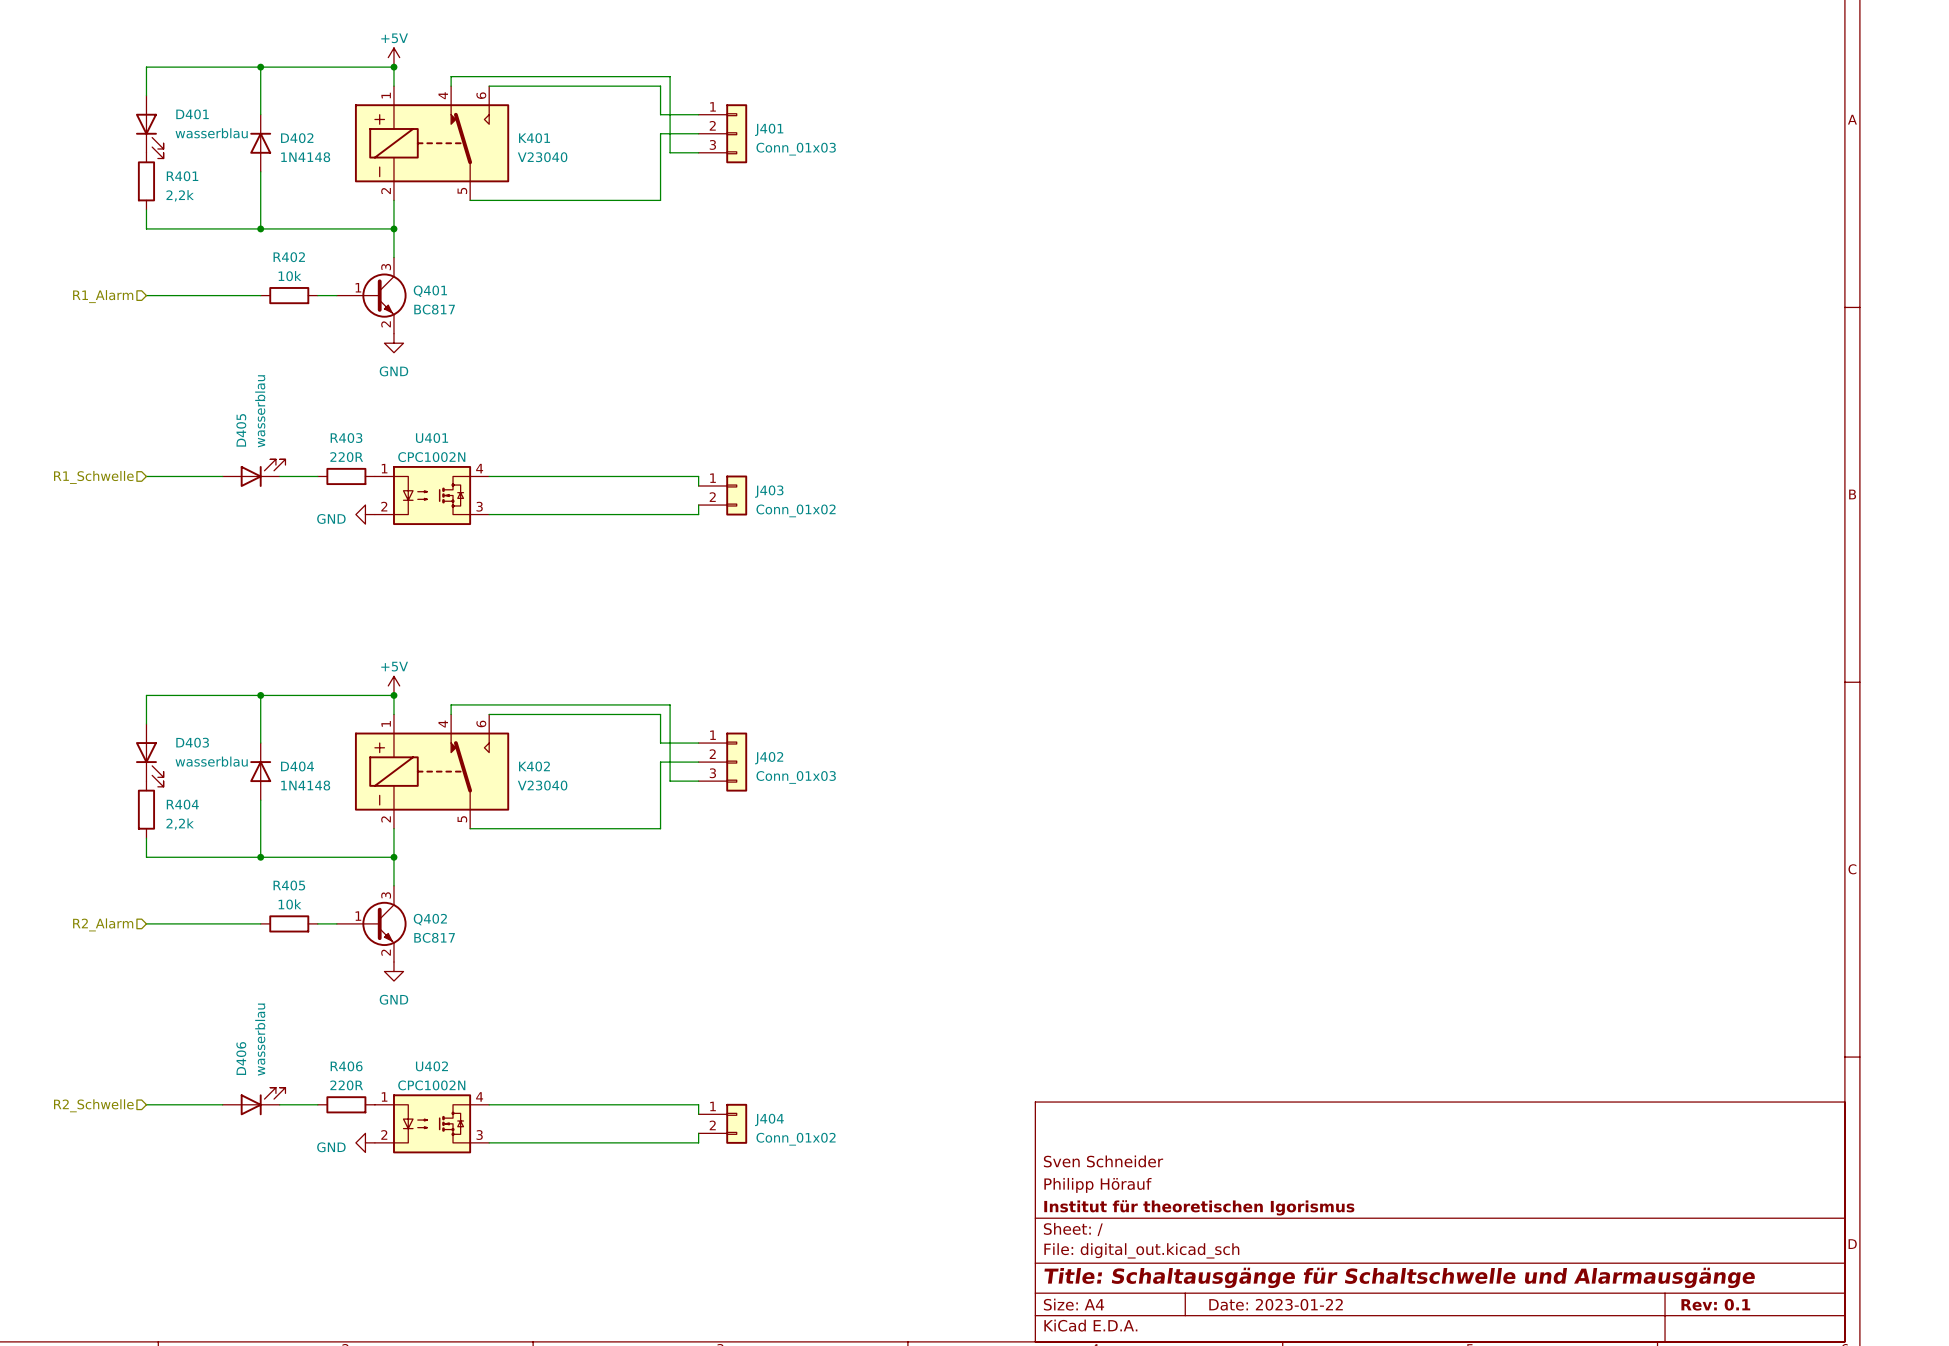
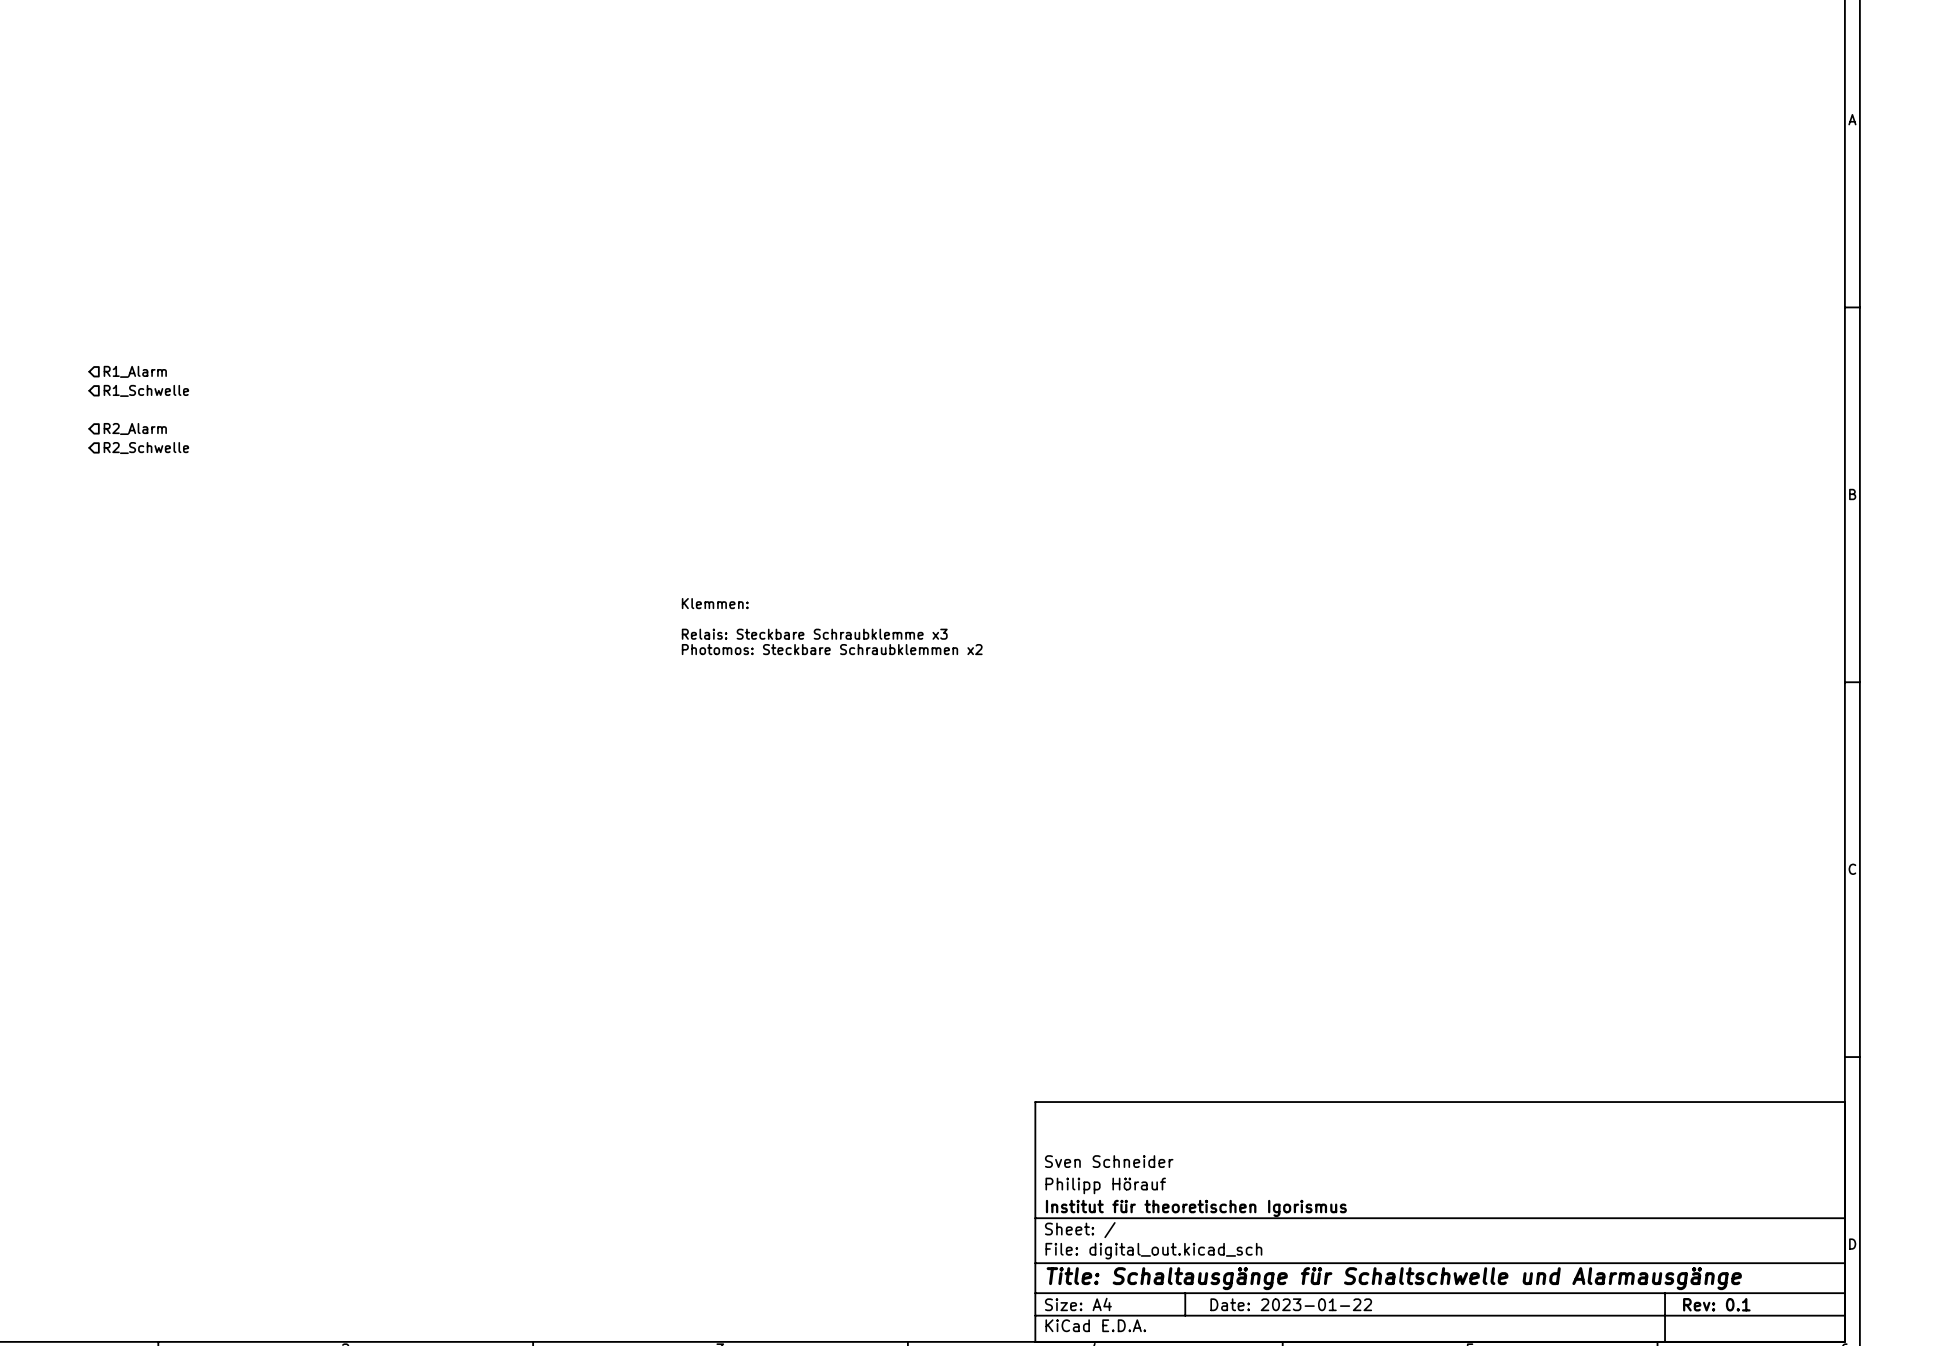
power symbol: +5V (393, 57) -> none
wire: (260, 67) (260, 114) -> none
junction: (260, 67) -> none
junction: (393, 67) -> none
wire: (393, 86) (393, 67) (146, 67) (146, 95) -> none
wire: (451, 86) (451, 76) (670, 76) (670, 152) (698, 152) -> none
wire: (489, 86) (660, 86) (660, 114) (698, 114) -> none
D401: wasserblau (149, 127) -> none
wire: (698, 133) (660, 133) (660, 200) (470, 200) -> none
J401: Conn_01x03 (722, 133) -> none
D402: 1N4148 (260, 143) -> none
K401: V23040 (432, 143) -> none
wire: (260, 171) (260, 228) -> none
R401: 2,2k (146, 181) -> none
wire: (393, 200) (393, 257) -> none
wire: (146, 209) (146, 228) (393, 228) -> none
junction: (260, 228) -> none
junction: (393, 228) -> none
wire: (146, 295) (260, 295) -> none
R402: 10k (289, 295) -> none
wire: (317, 295) (336, 295) -> none
Q401: BC817 (371, 295) -> none
hierarchical label rotation: 0° (103, 296) -> 180° (135, 371)
hierarchical label position: R1_Alarm (103, 296) -> R1_Alarm (135, 371)
power symbol: GND (393, 343) -> none
hierarchical label: none -> R2_Alarm (135, 428)
hierarchical label: none -> R2_Schwelle (146, 448)
D405: wasserblau (254, 473) -> none
wire: (146, 476) (222, 476) -> none
wire: (279, 476) (317, 476) -> none
R403: 220R (346, 476) -> none
wire: (489, 476) (698, 476) (698, 485) -> none
hierarchical label rotation: 0° (93, 477) -> 180° (146, 390)
hierarchical label position: R1_Schwelle (93, 477) -> R1_Schwelle (146, 390)
U401: CPC1002N (432, 495) -> none
J403: Conn_01x02 (722, 495) -> none
wire: (698, 505) (698, 514) (489, 514) -> none
power symbol: GND (365, 514) -> none
text: none -> Klemmen: (715, 603)
text: none -> Relais: Steckbare Schraubklemme x3 (814, 634)
text: none -> Photomos: Steckbare Schraubklemmen x2 (832, 649)
power symbol: +5V (393, 685) -> none
wire: (260, 695) (260, 743) -> none
junction: (260, 695) -> none
junction: (393, 695) -> none
wire: (393, 714) (393, 695) (146, 695) (146, 724) -> none
wire: (451, 714) (451, 704) (670, 704) (670, 781) (698, 781) -> none
wire: (489, 714) (660, 714) (660, 743) (698, 743) -> none
D403: wasserblau (149, 755) -> none
wire: (698, 762) (660, 762) (660, 828) (470, 828) -> none
J402: Conn_01x03 (722, 762) -> none
D404: 1N4148 (260, 771) -> none
K402: V23040 (432, 771) -> none
wire: (260, 800) (260, 857) -> none
R404: 2,2k (146, 809) -> none
wire: (393, 828) (393, 885) -> none
wire: (146, 838) (146, 857) (393, 857) -> none
junction: (260, 857) -> none
junction: (393, 857) -> none
wire: (146, 923) (260, 923) -> none
R405: 10k (289, 923) -> none
wire: (317, 923) (336, 923) -> none
Q402: BC817 (371, 923) -> none
hierarchical label: R2_Alarm (103, 924) -> none
power symbol: GND (393, 971) -> none
D406: wasserblau (254, 1101) -> none
wire: (146, 1104) (222, 1104) -> none
wire: (279, 1104) (317, 1104) -> none
R406: 220R (346, 1104) -> none
wire: (489, 1104) (698, 1104) (698, 1114) -> none
hierarchical label: R2_Schwelle (93, 1105) -> none
U402: CPC1002N (432, 1123) -> none
J404: Conn_01x02 (722, 1123) -> none
wire: (698, 1133) (698, 1142) (489, 1142) -> none
power symbol: GND (365, 1142) -> none

